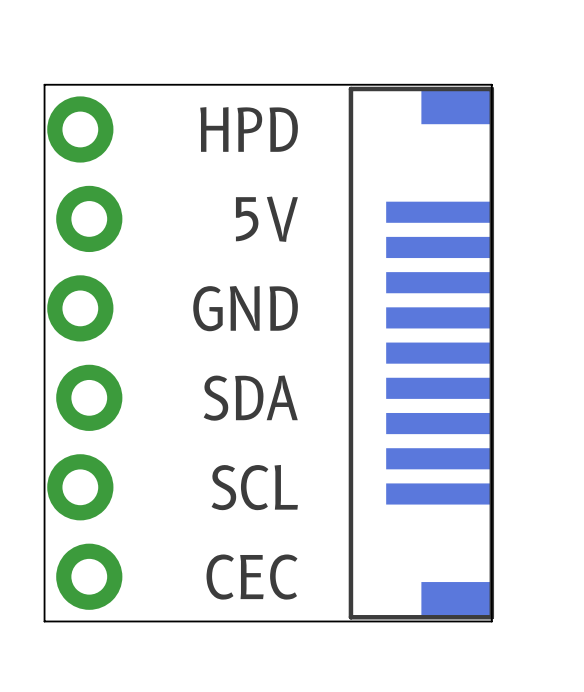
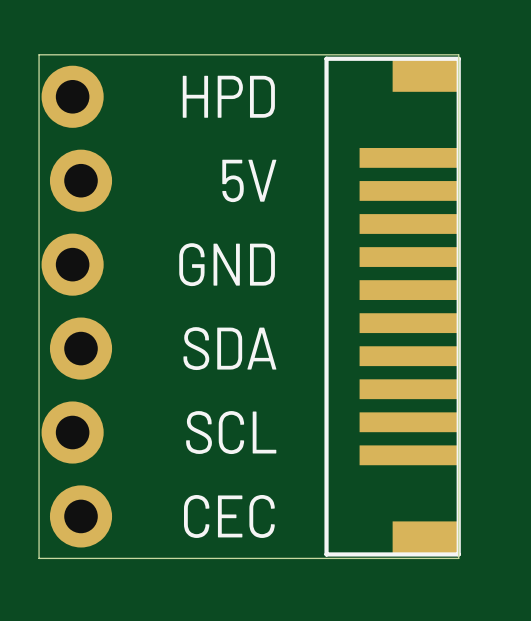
part footprint: [348, 86, 495, 620] -> [324, 56, 461, 557]

